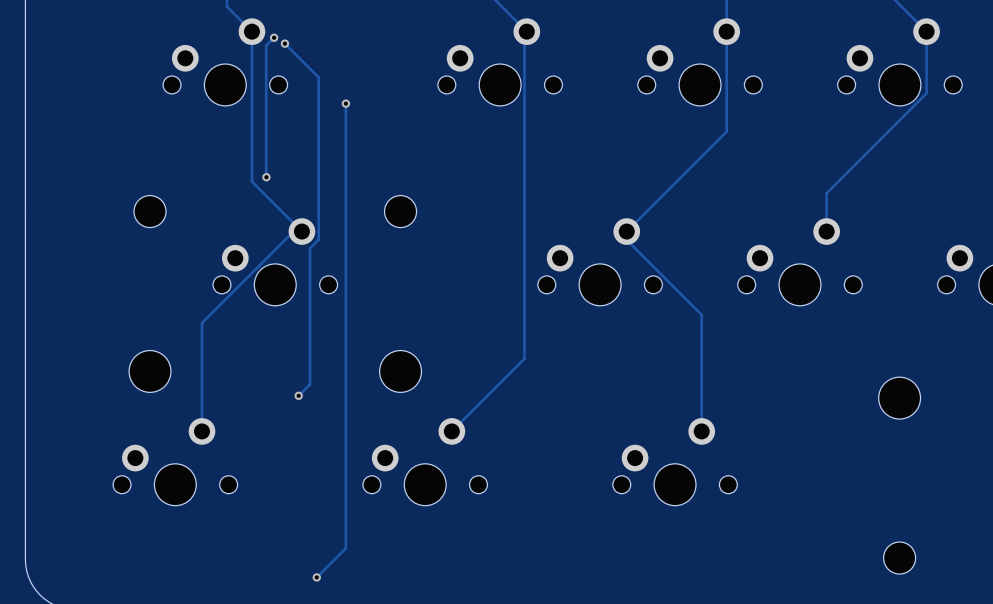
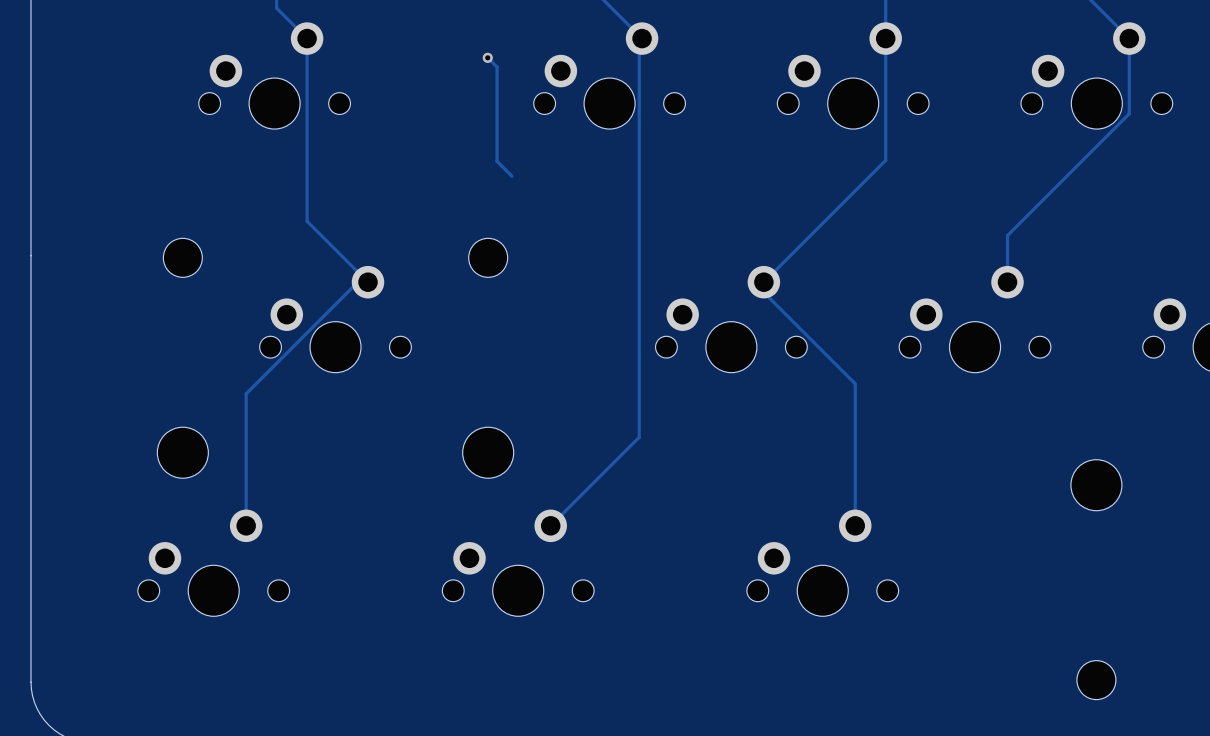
track: (274, 37) (266, 45) (266, 177) -> none
via: (274, 37) -> none
track: (284, 43) (318, 77) (318, 239) (309, 248) (309, 384) (298, 395) -> none
via: (284, 43) -> none
track: none -> (487, 57) (497, 67) (497, 161) (511, 176)
via: none -> (487, 57)
track: (345, 103) (345, 548) (316, 577) -> none
via: (345, 103) -> none
via: (266, 177) -> none
via: (298, 395) -> none
via: (316, 577) -> none

